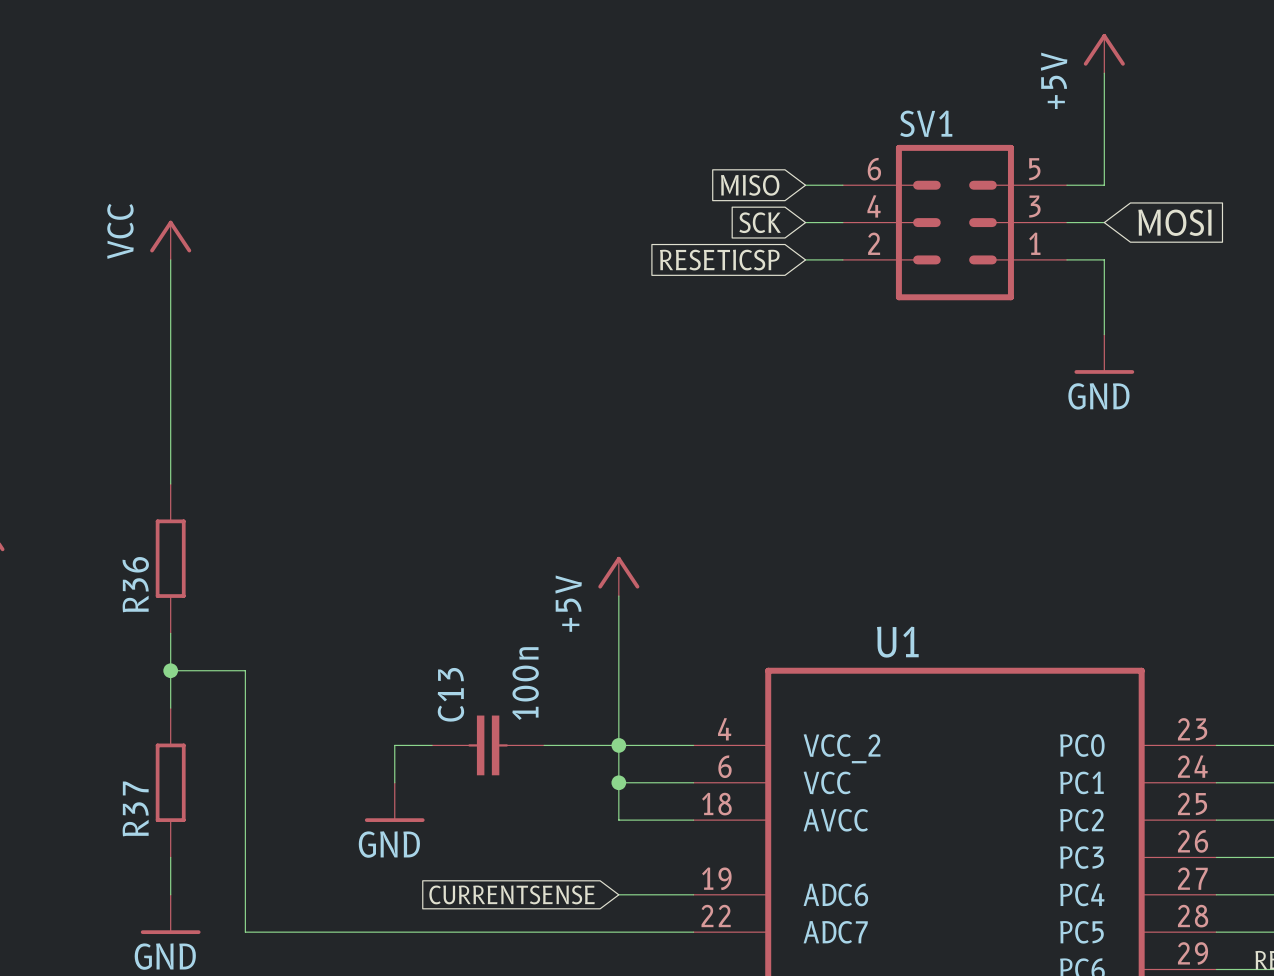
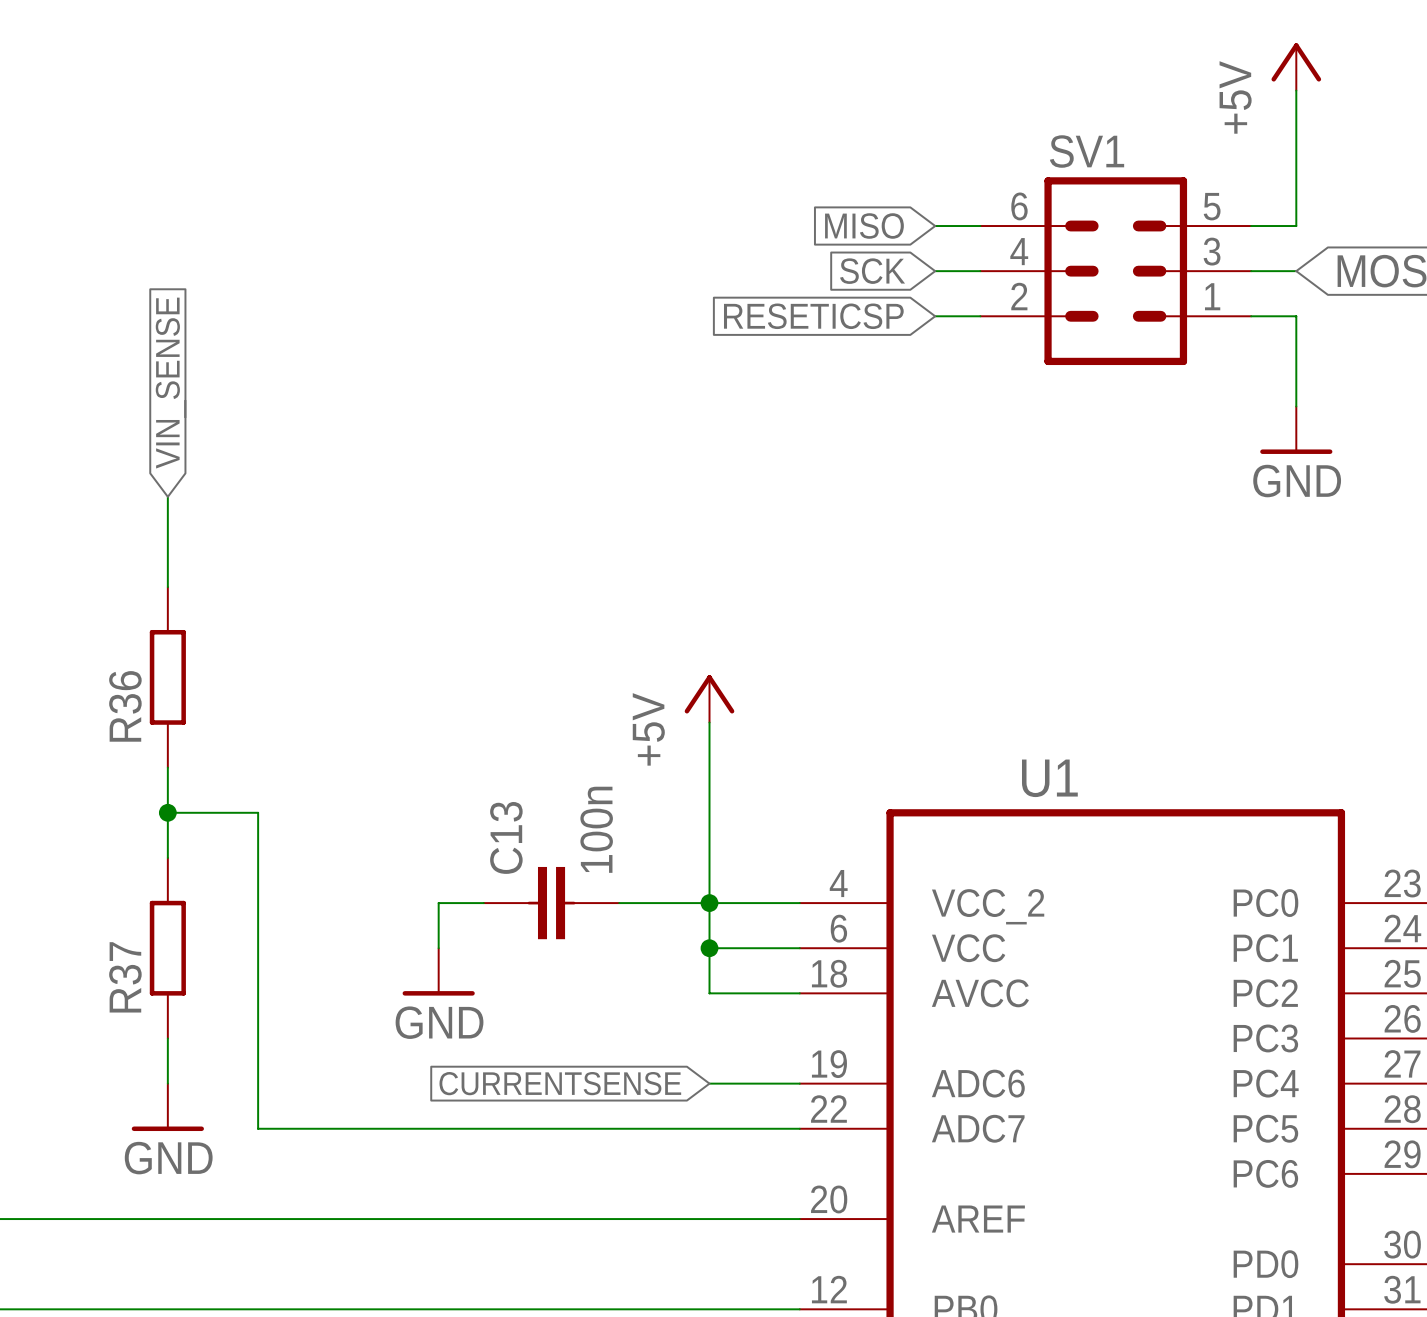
power symbol: VCC (170, 240) -> none
wire: (170, 259) (170, 409) -> none
global label: none -> VIN_SENSE (171, 383)

